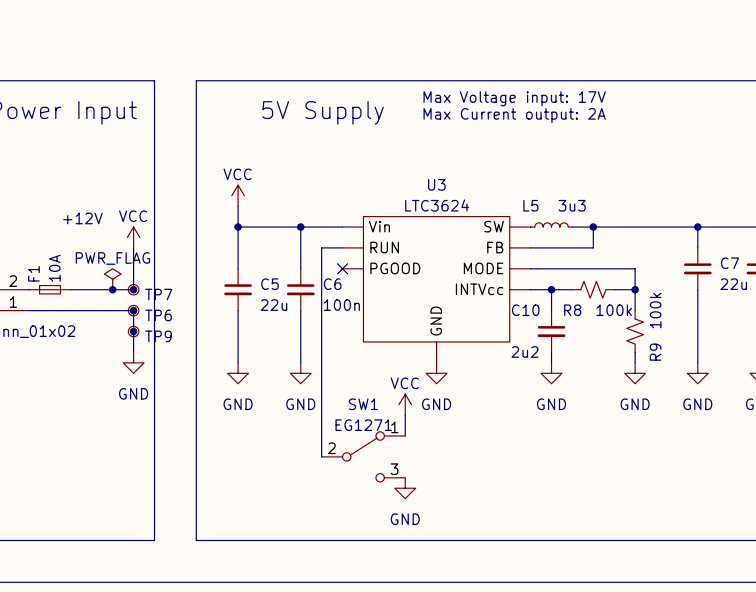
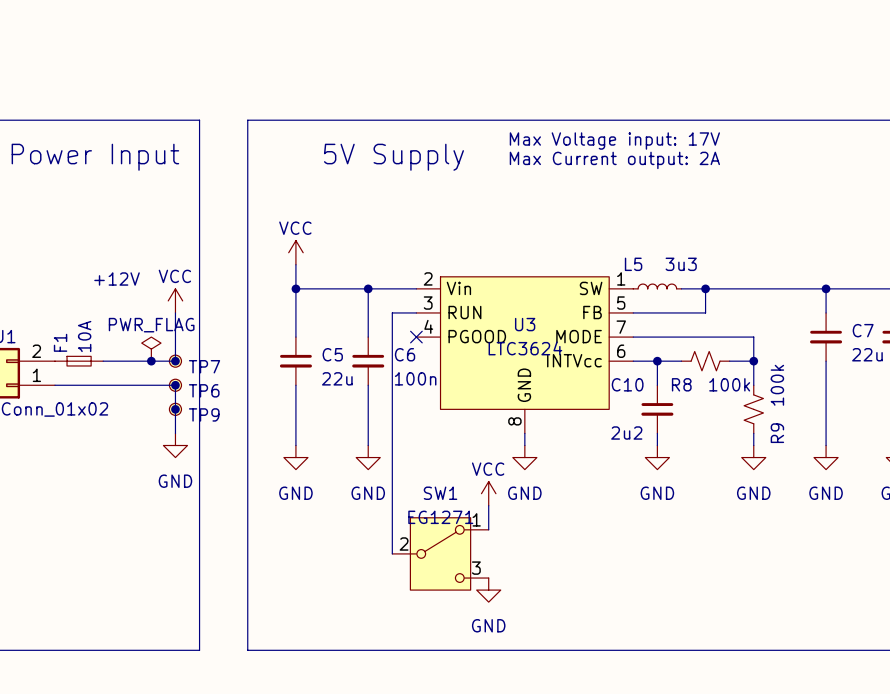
U3 name position: U3 (436, 184) -> U3 (525, 324)
U3 value position: LTC3624 (437, 205) -> LTC3624 (525, 348)
U3 symbol: [342, 216, 531, 363] -> [416, 276, 634, 434]
SW1 symbol: [321, 431, 406, 482] -> [392, 517, 489, 591]

